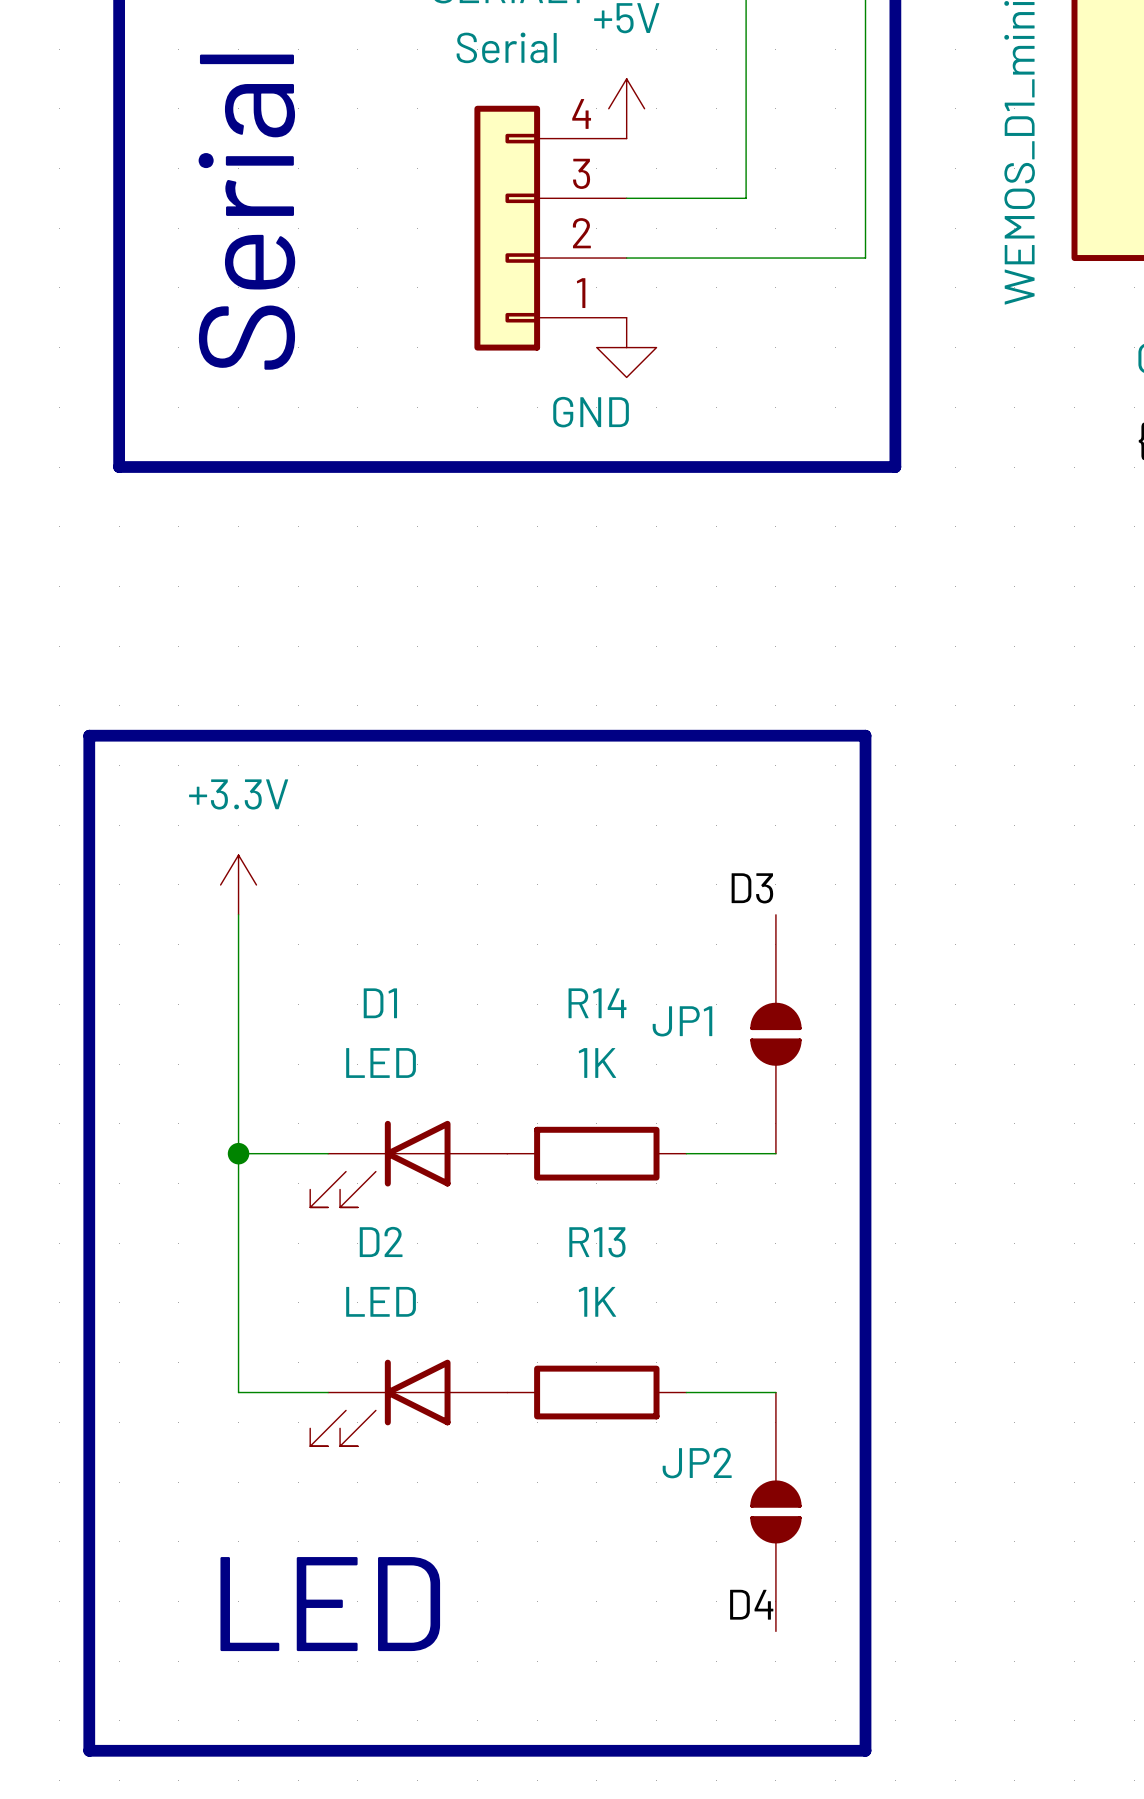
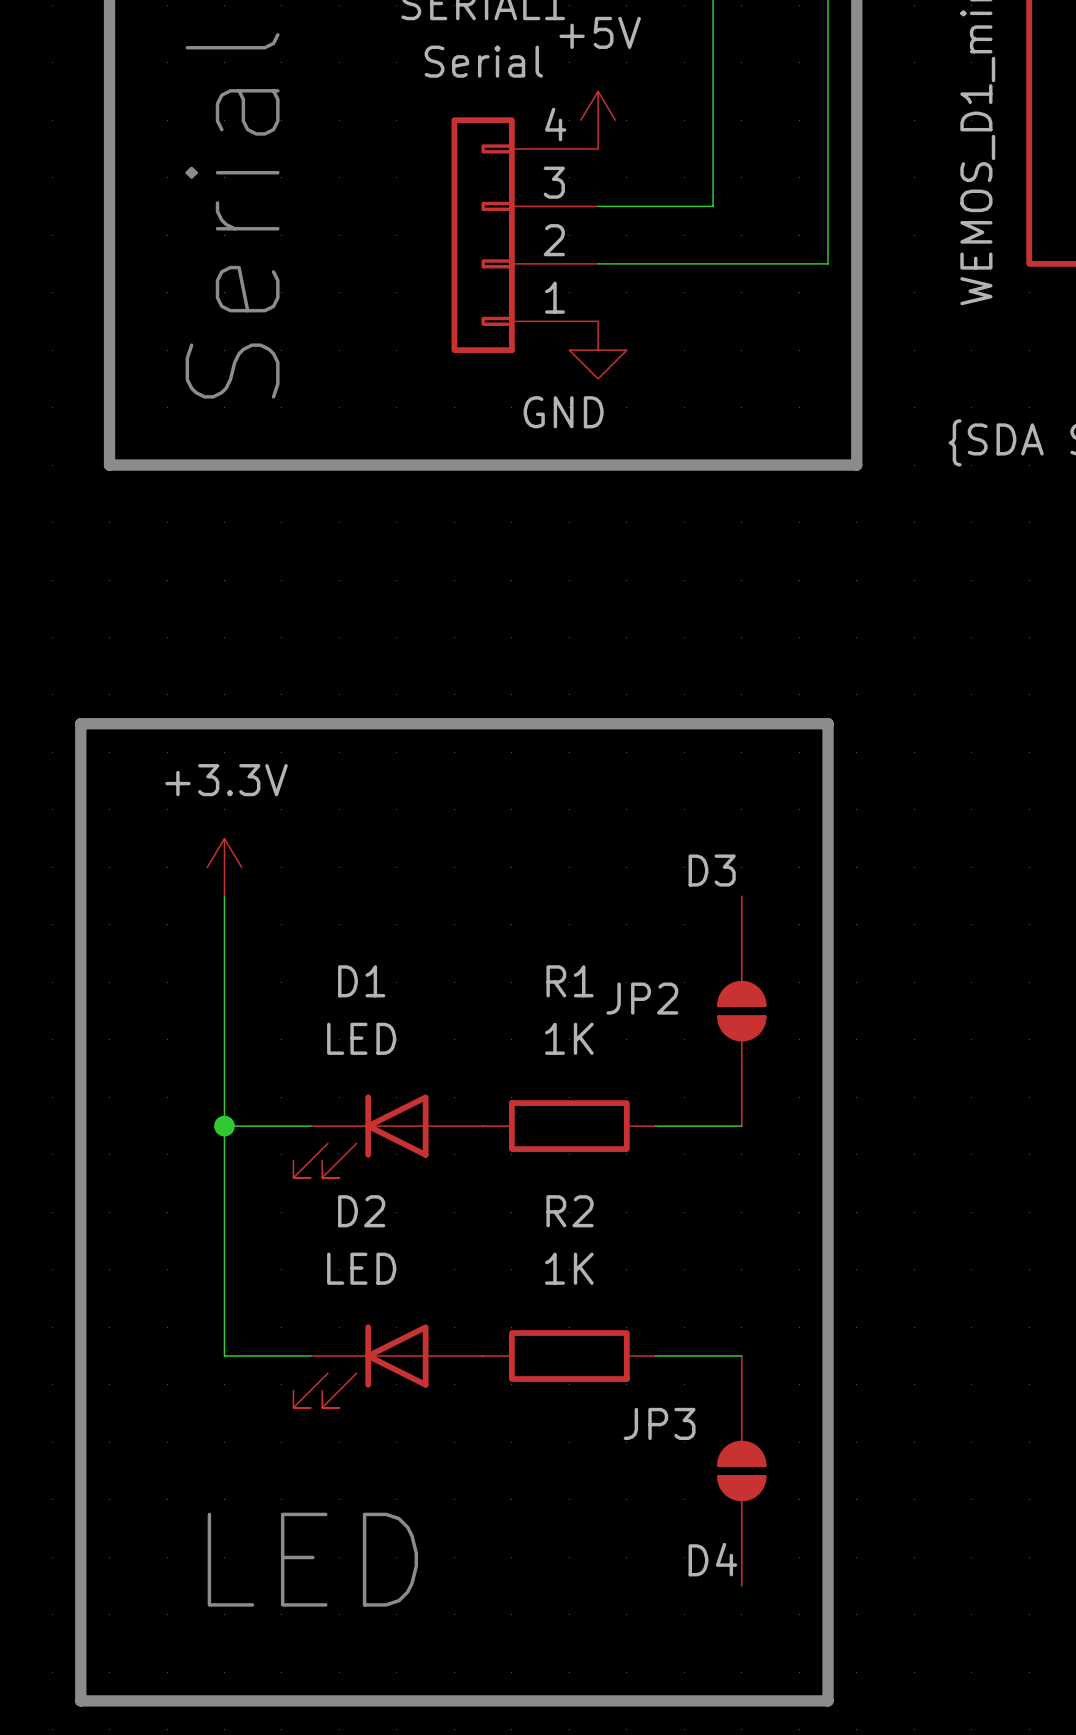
R14 name: R14 (597, 1003) -> R1 (570, 981)
JP1 name: JP1 (682, 1021) -> JP2 (642, 998)
R13 name: R13 (597, 1242) -> R2 (570, 1211)
JP2 name: JP2 (697, 1463) -> JP3 (659, 1423)

